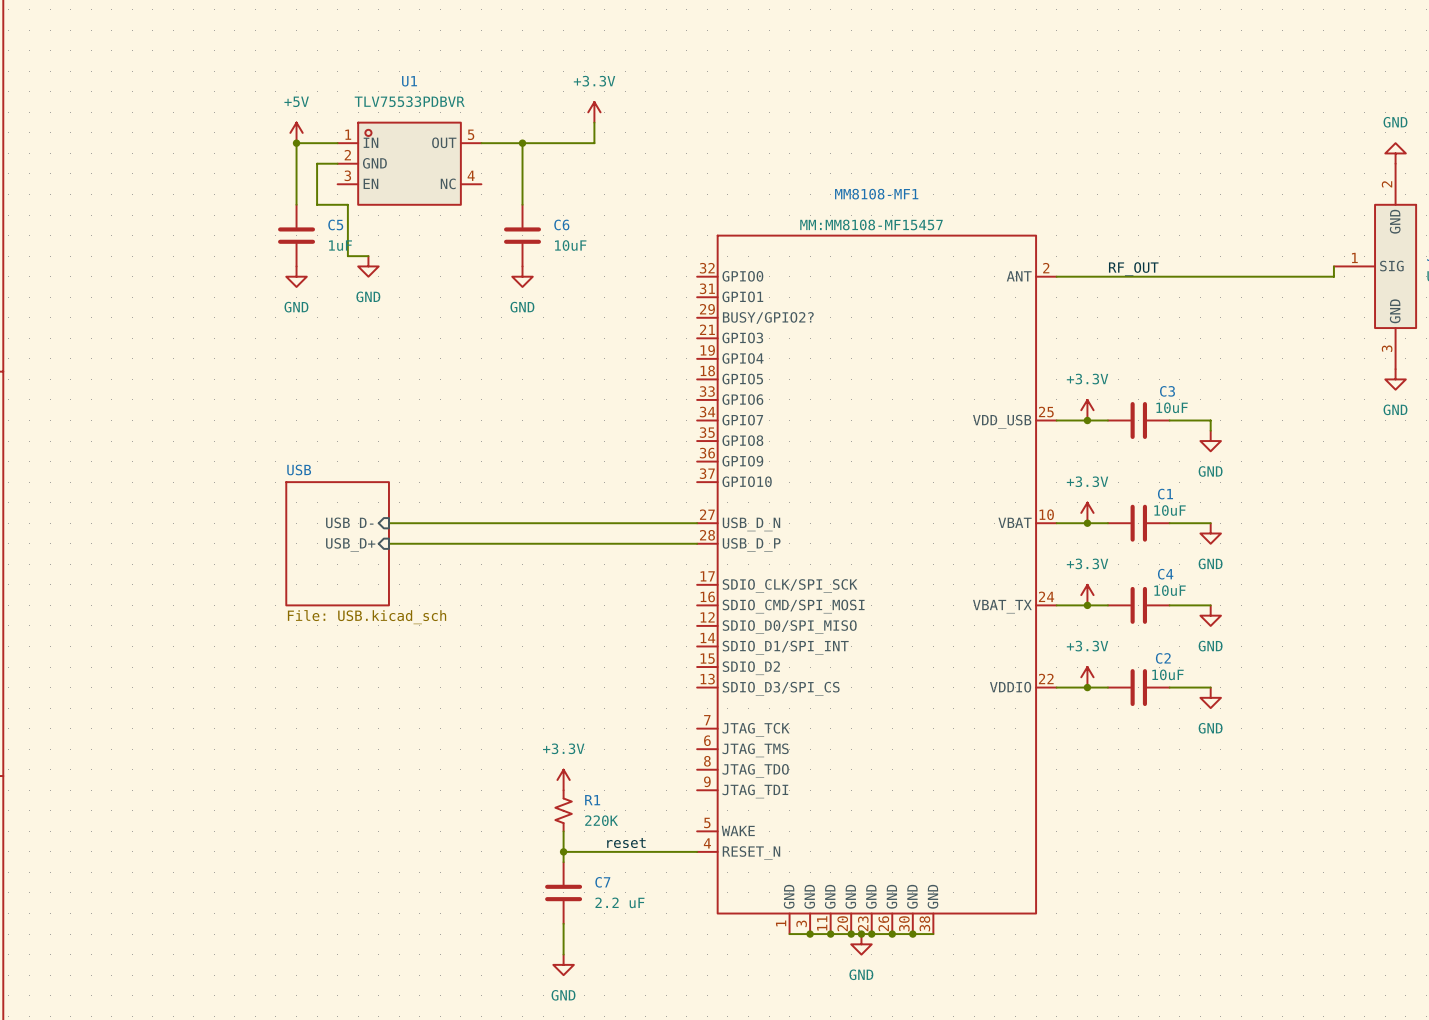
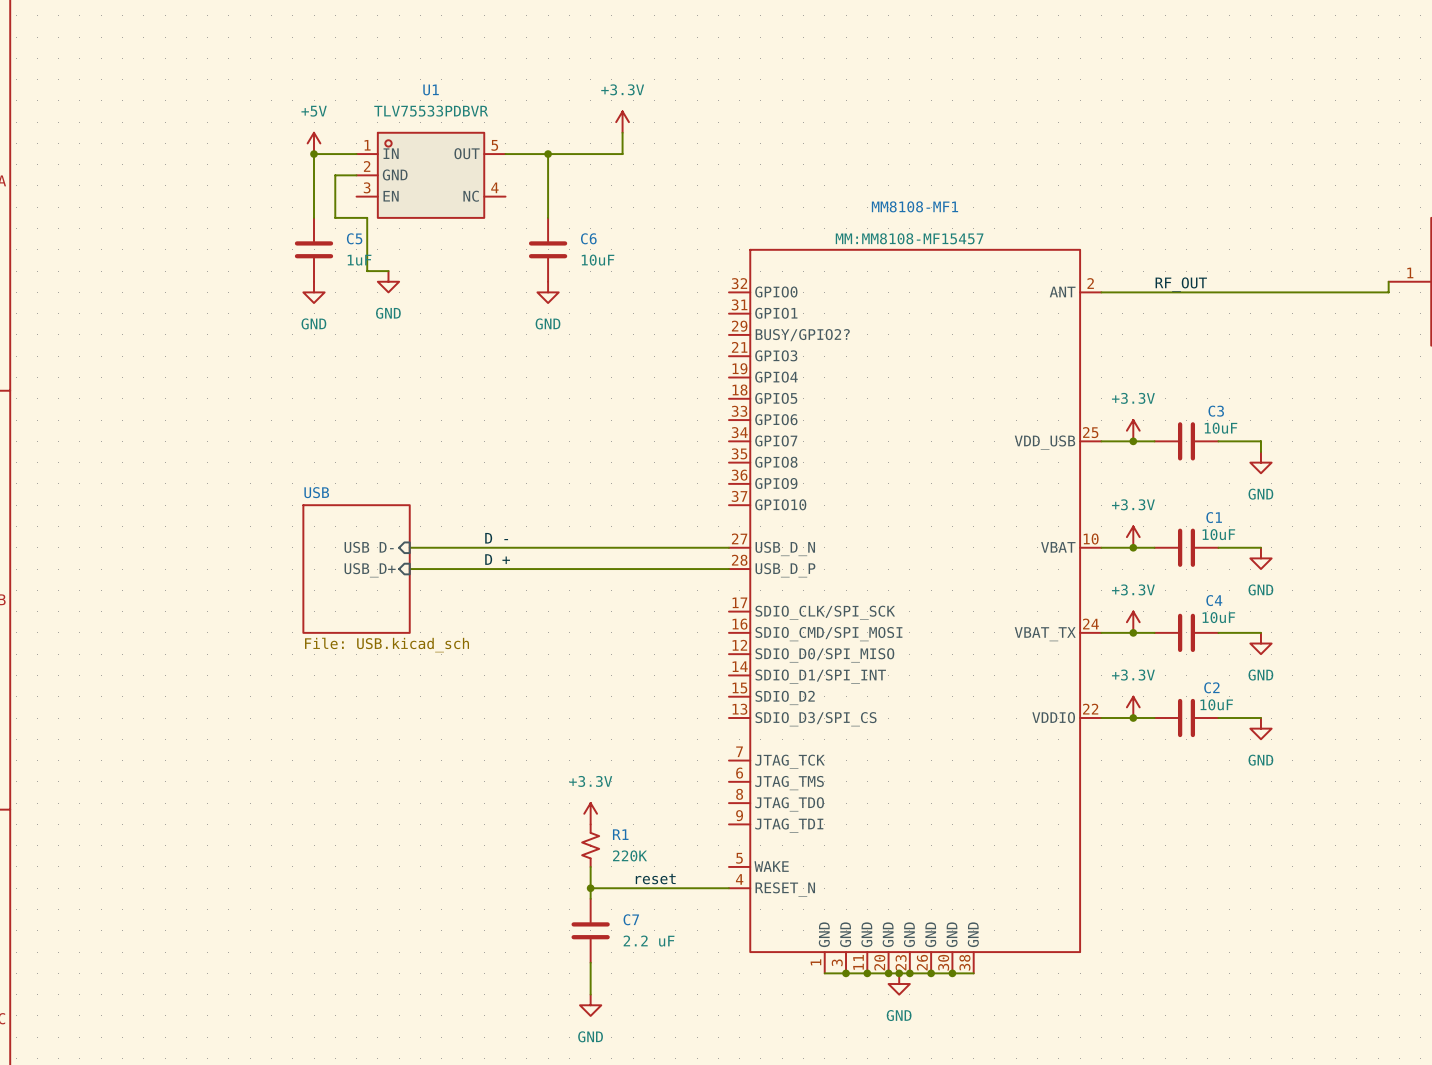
label: none -> D - (496, 538)
label: none -> D + (497, 559)

